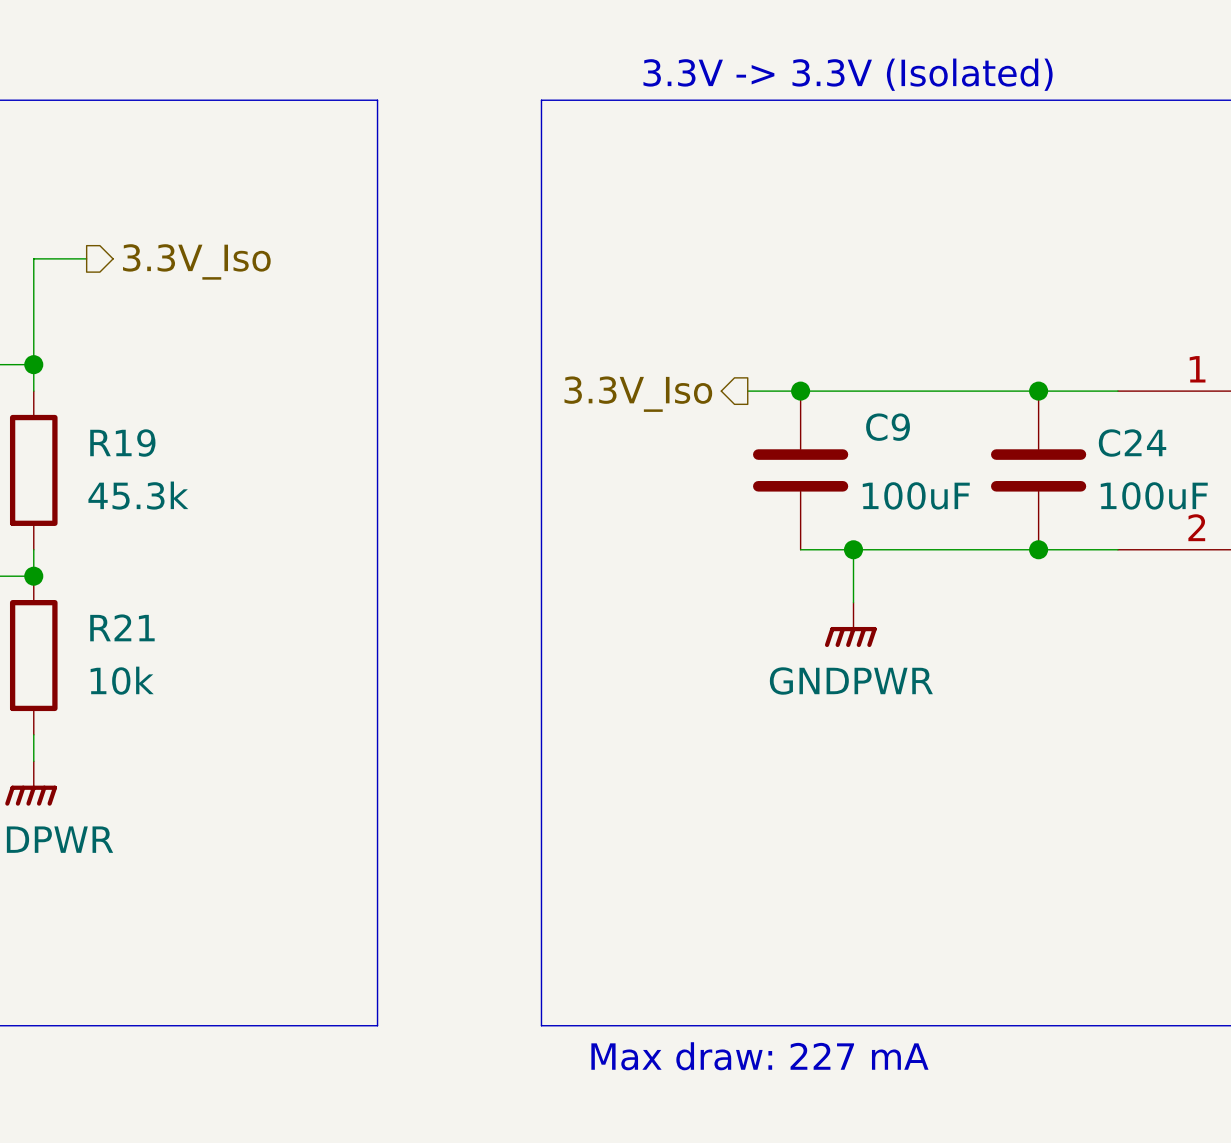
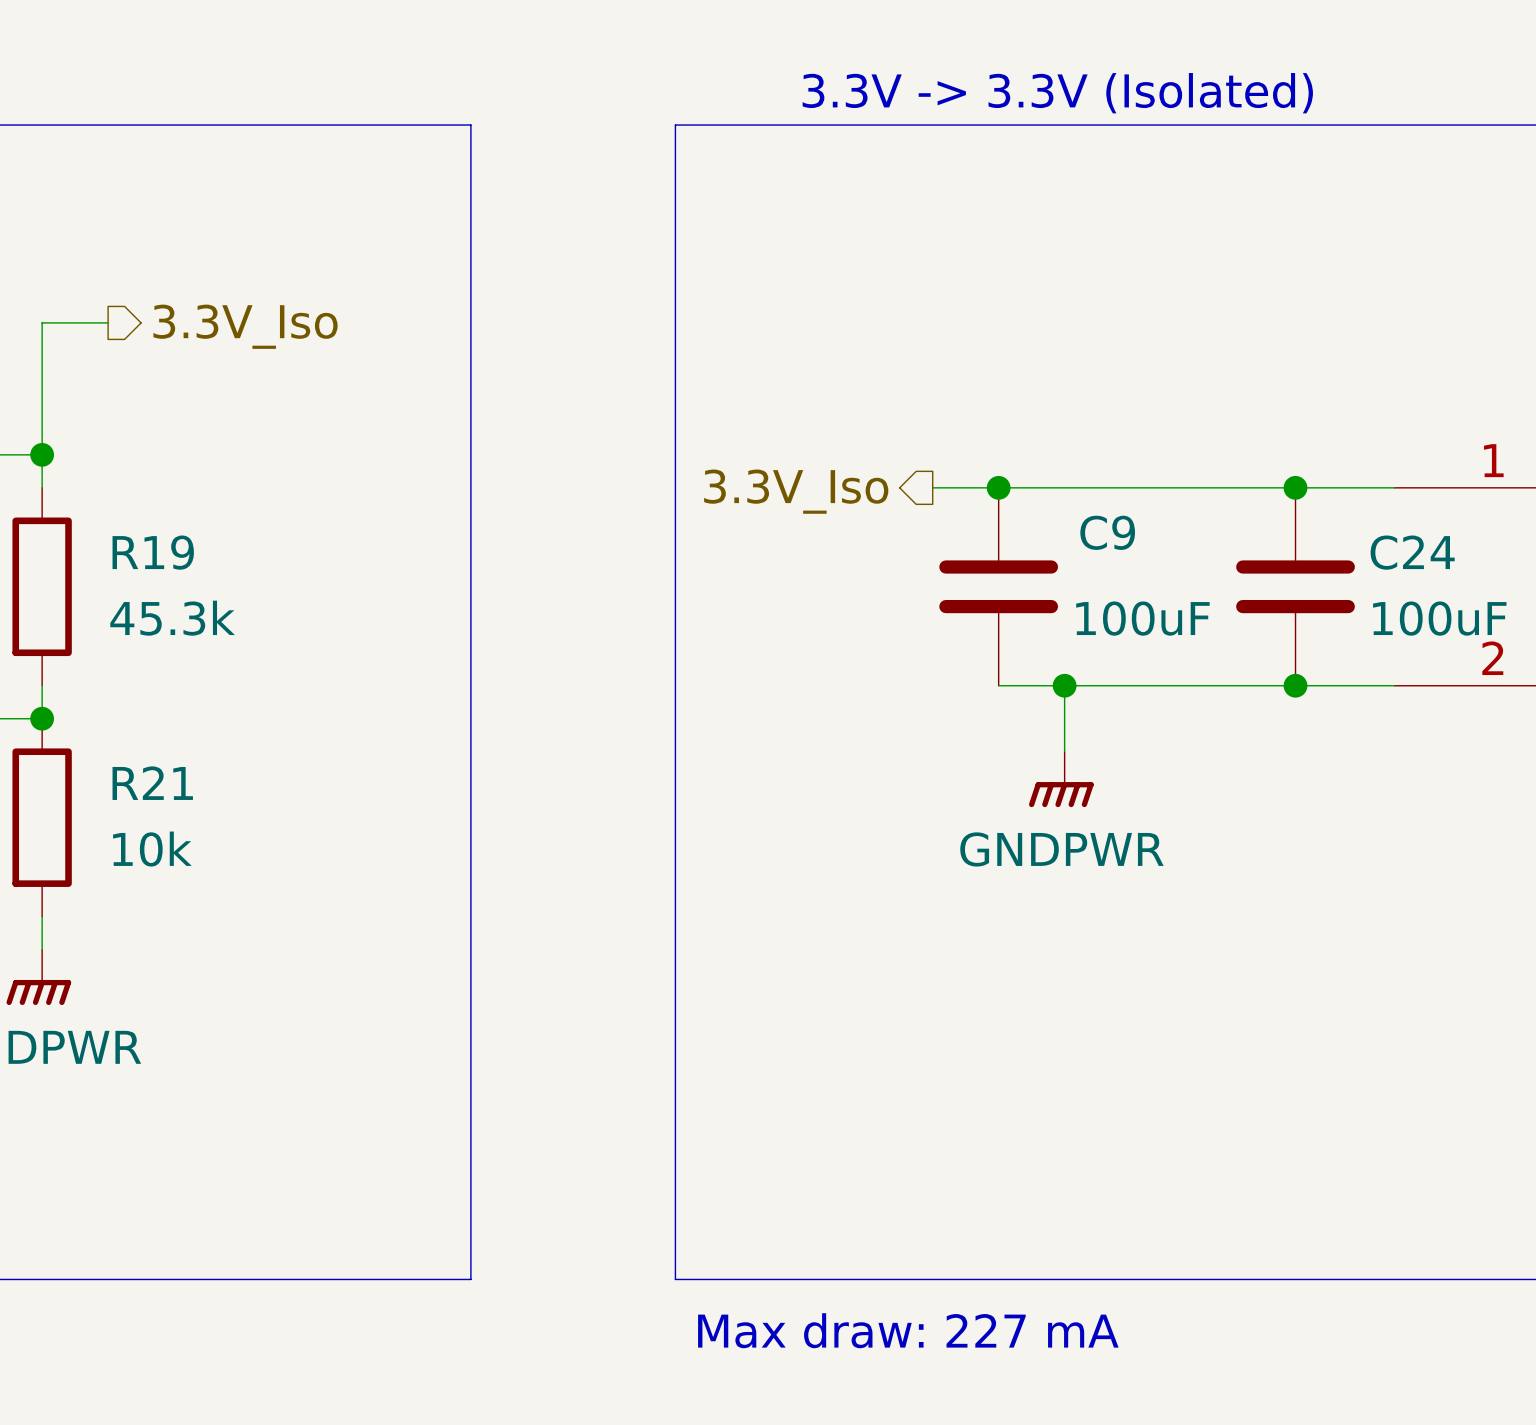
text position: Max draw: 227 mA (759, 1056) -> Max draw: 227 mA (908, 1330)

